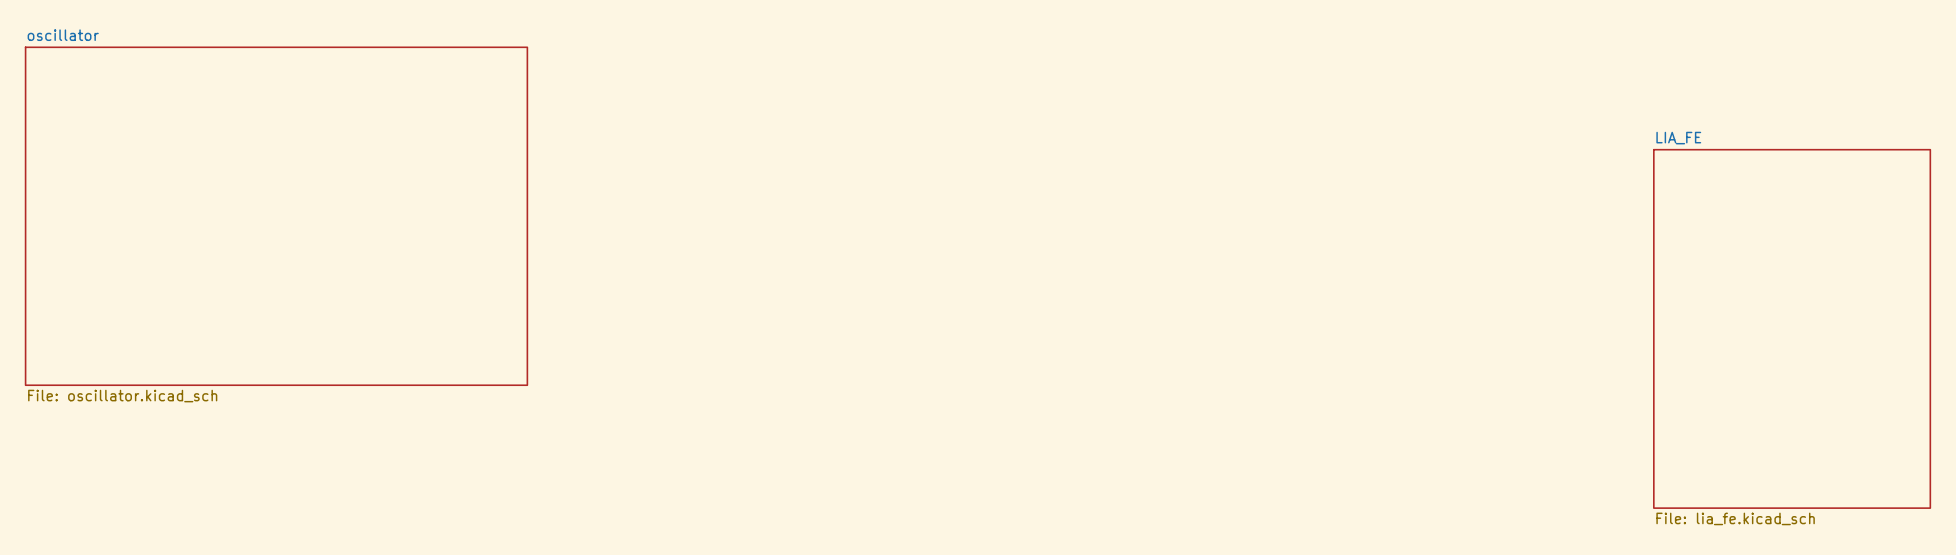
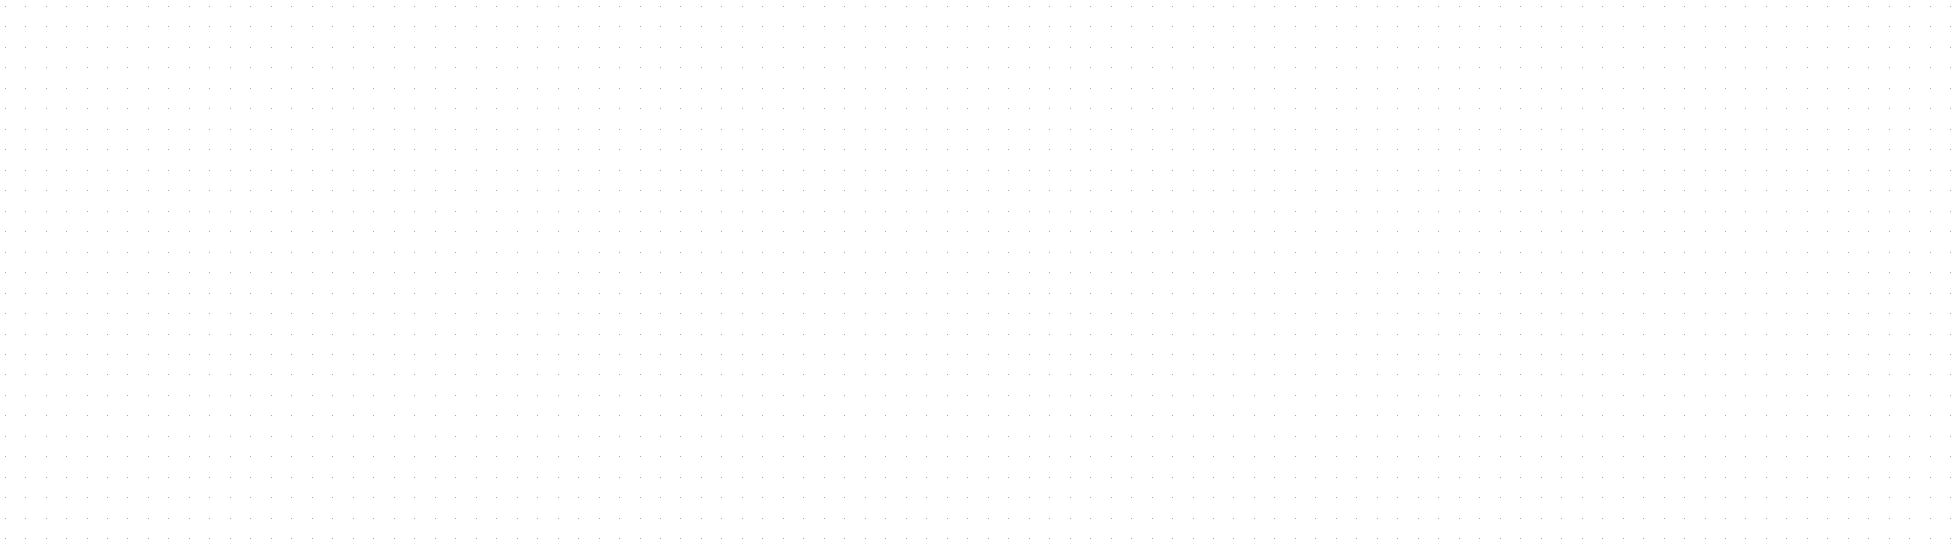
sheet oscillator: File: oscillator.kicad_sch (276, 216) -> none
sheet LIA_FE: File: lia_fe.kicad_sch (1792, 328) -> none

